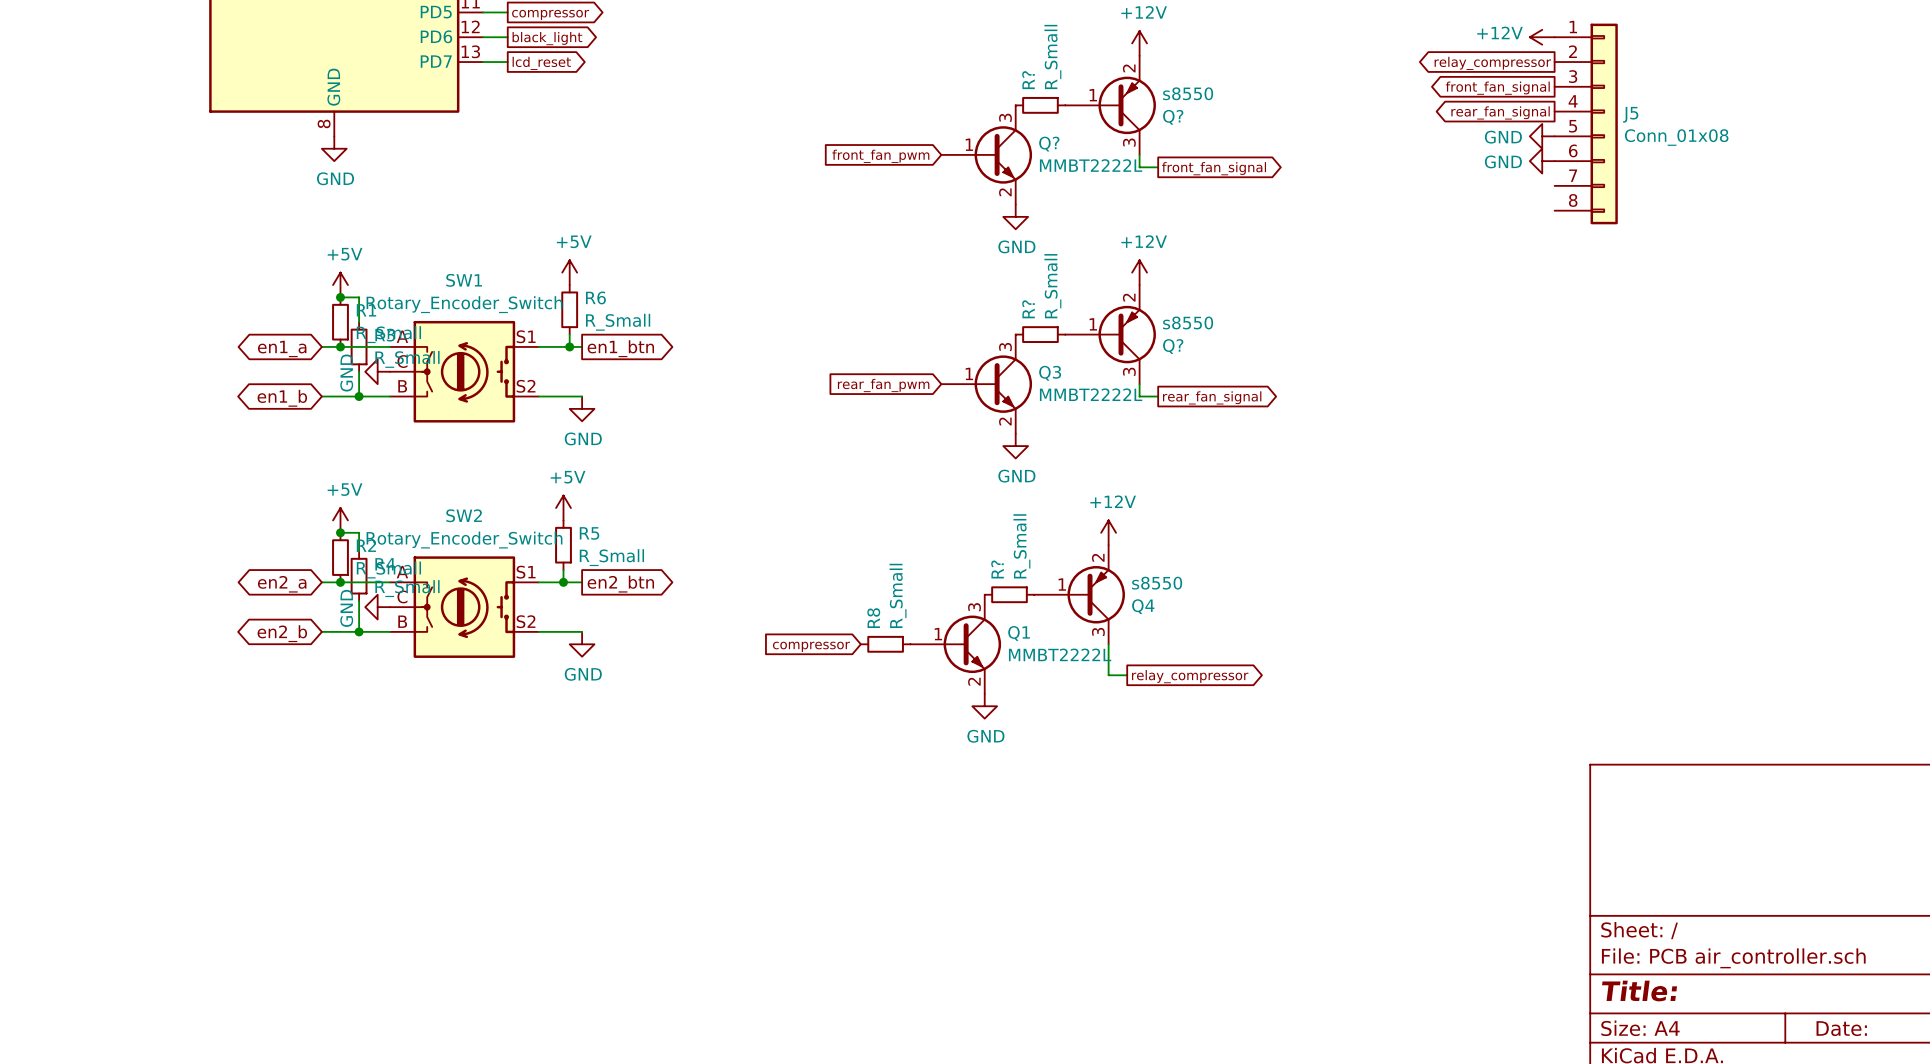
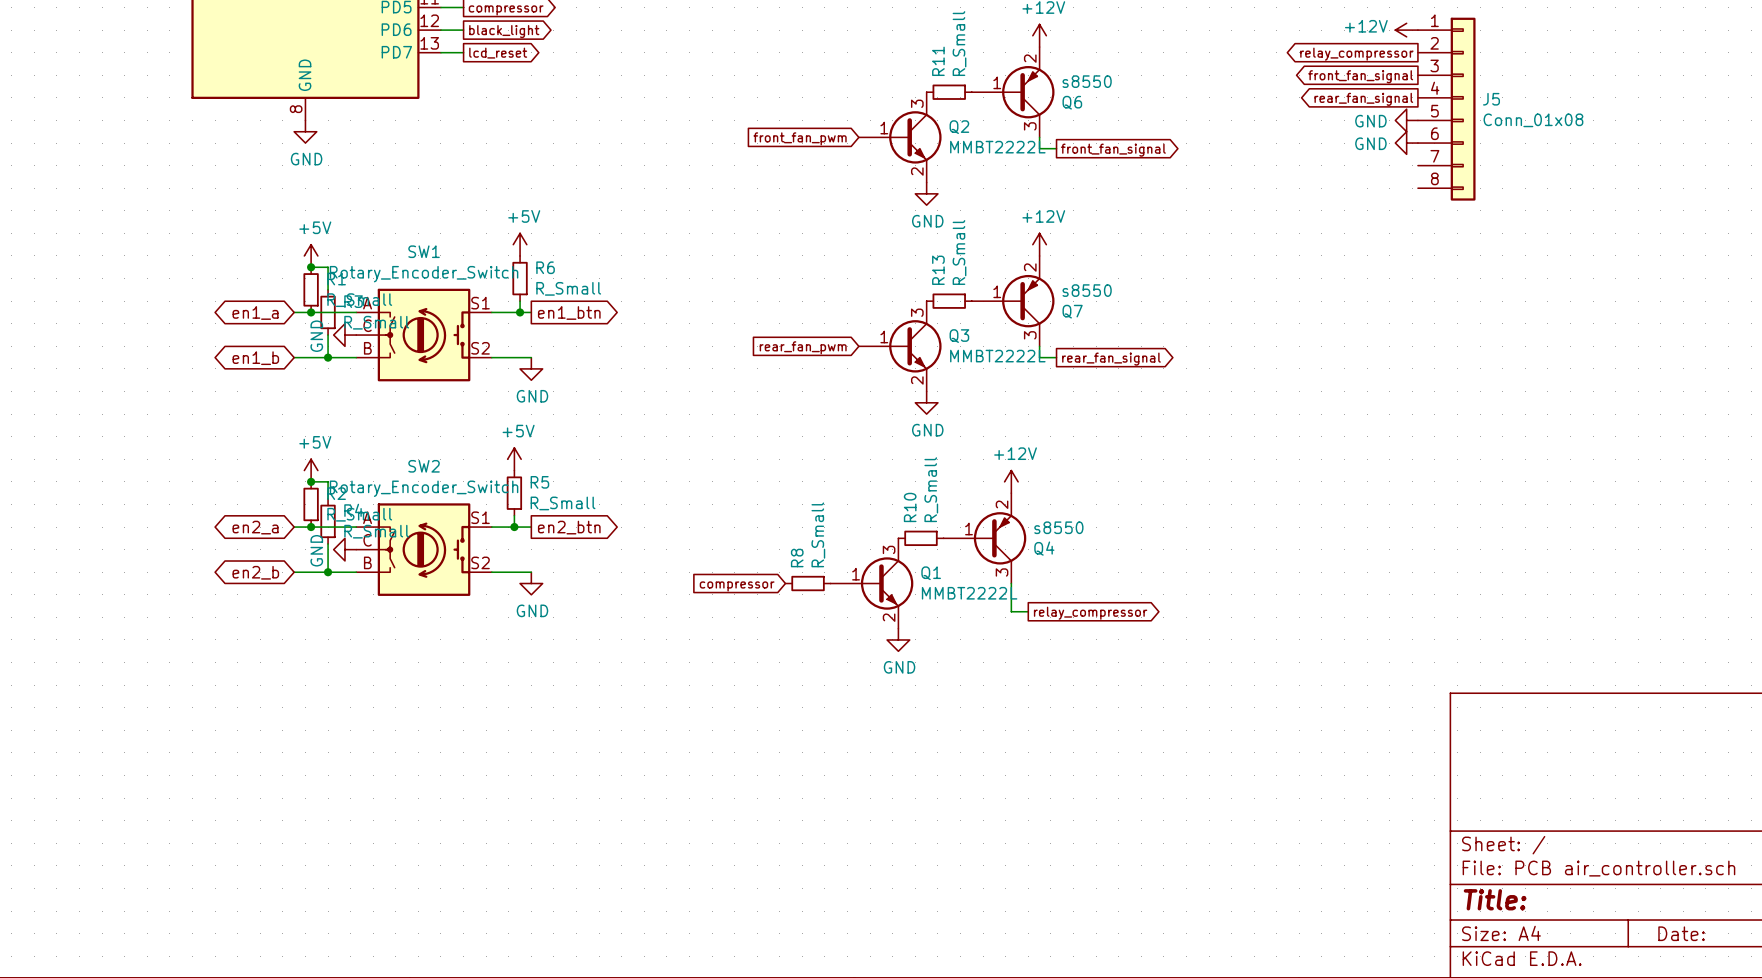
R? name: R? (1028, 80) -> R11 (938, 61)
Q? name: Q? (1173, 117) -> Q6 (1072, 102)
Q? name: Q? (1049, 144) -> Q2 (959, 127)
R? name: R? (1028, 309) -> R13 (938, 270)
Q? name: Q? (1173, 346) -> Q7 (1072, 311)
R? name: R? (997, 569) -> R10 (910, 507)

